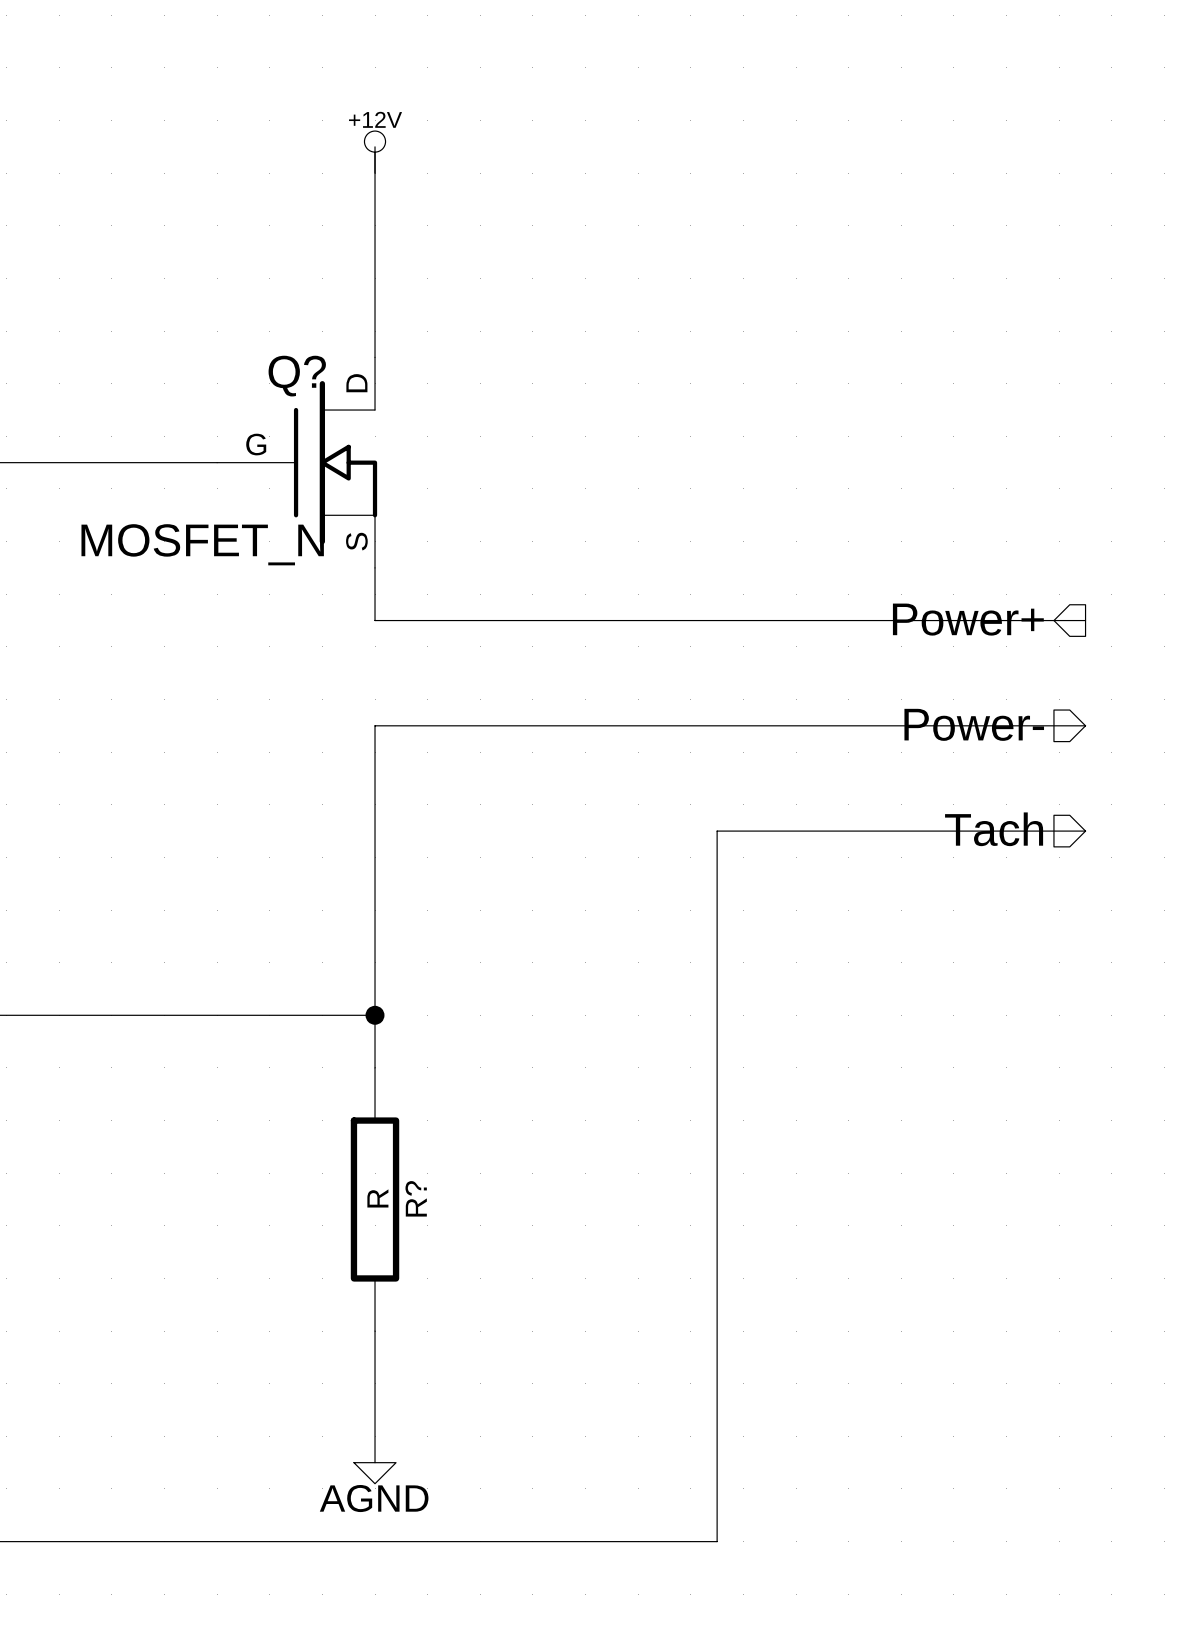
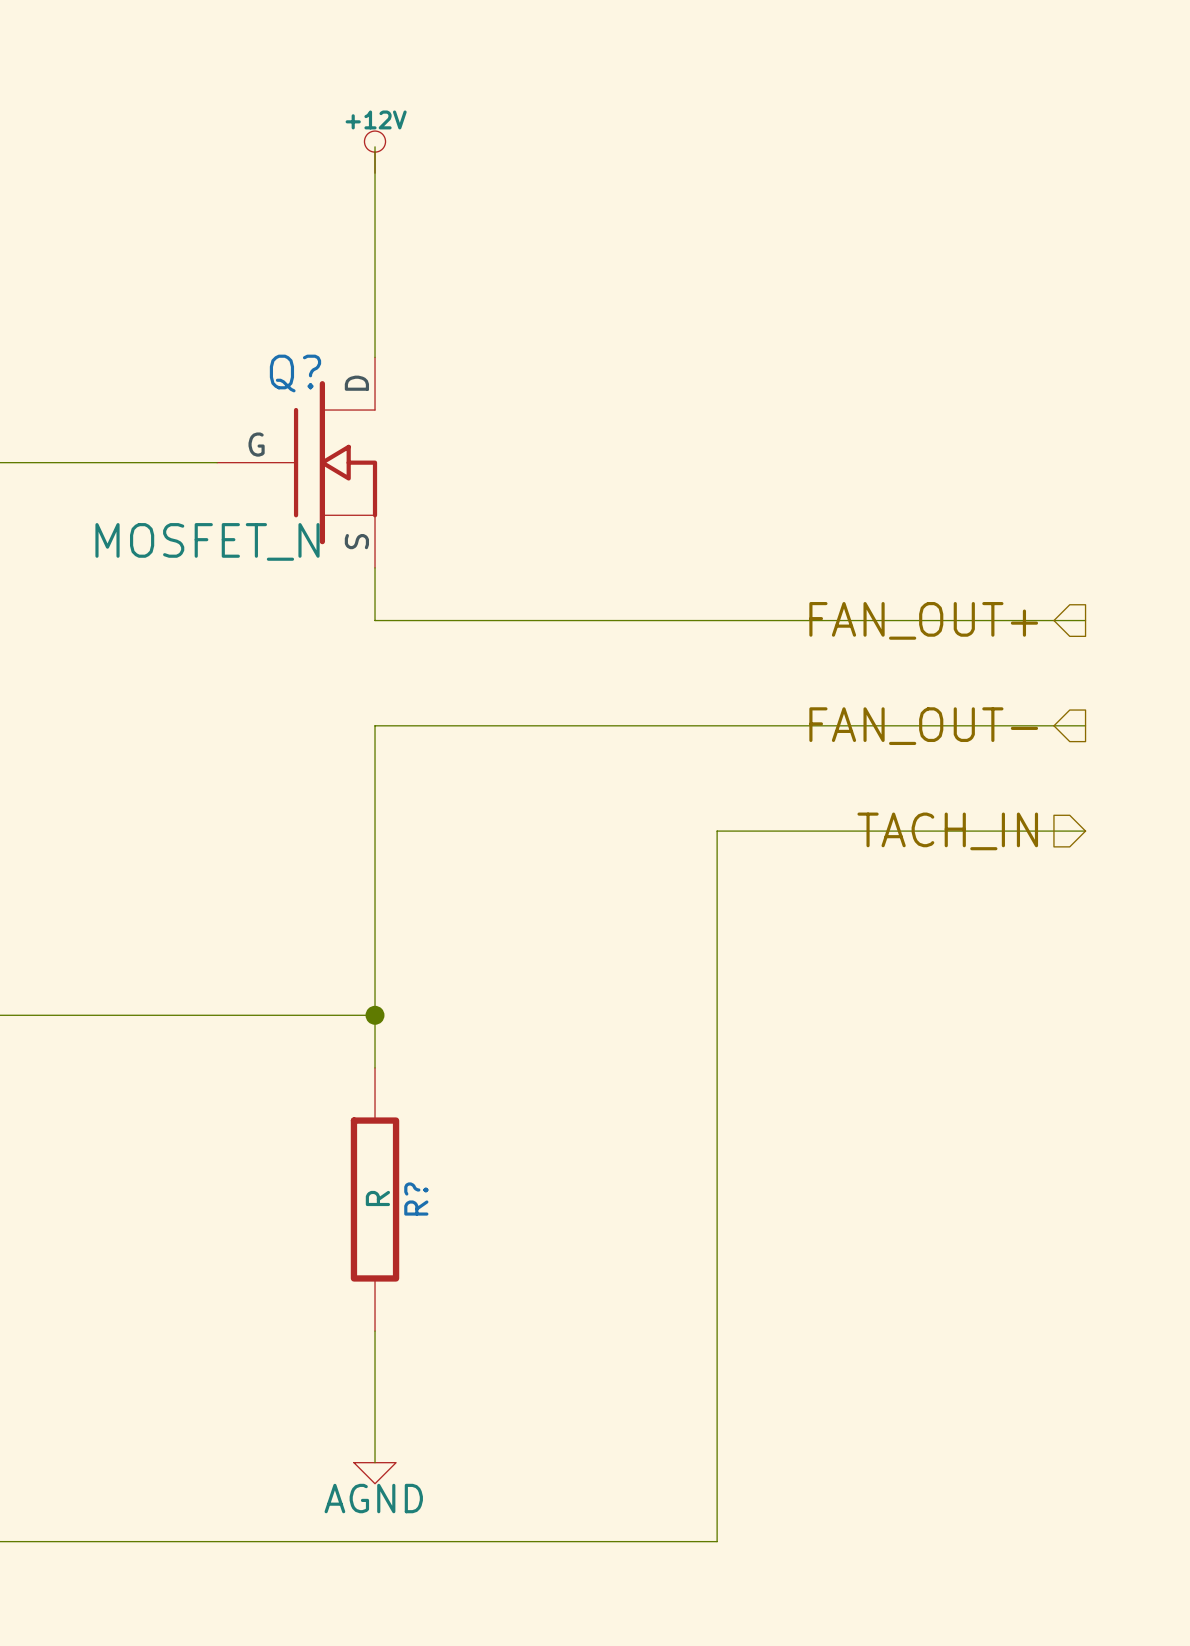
hierarchical label: Power+ (968, 619) -> FAN_OUT+ (923, 620)
hierarchical label shape: input (974, 724) -> output (923, 726)
hierarchical label: Power- (974, 724) -> FAN_OUT- (923, 726)
hierarchical label: Tach (994, 829) -> TACH_IN (947, 831)

